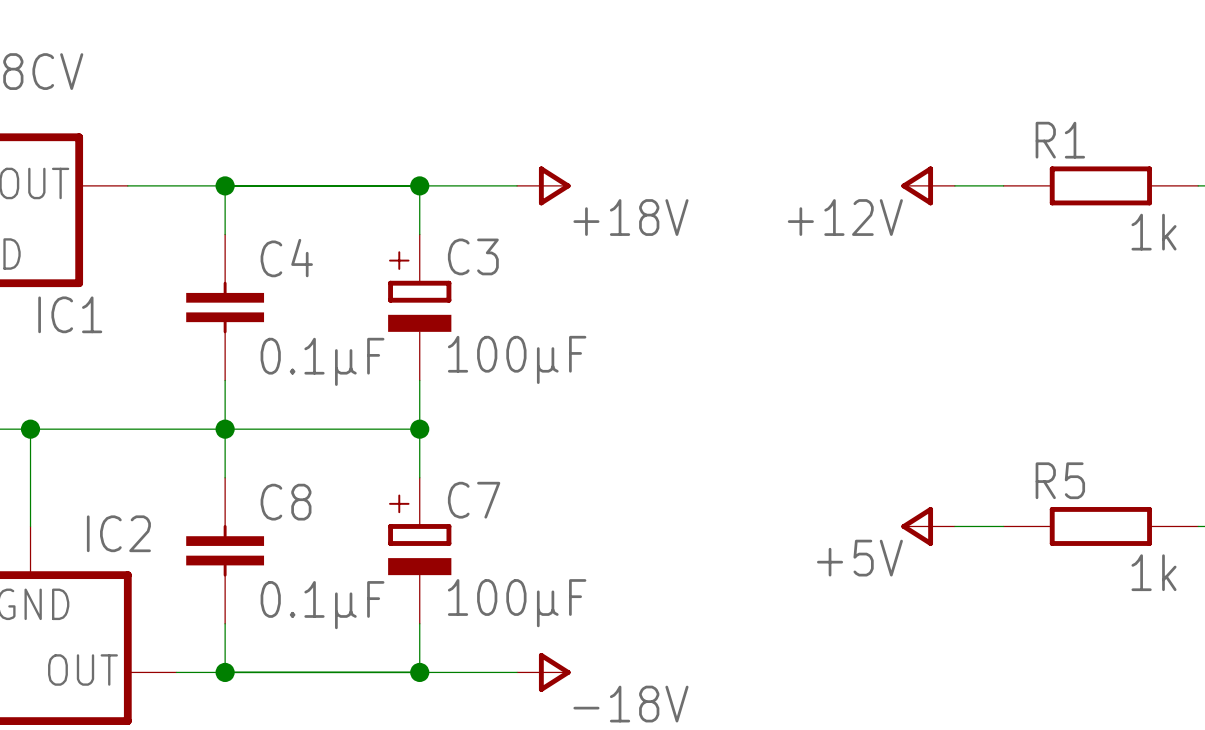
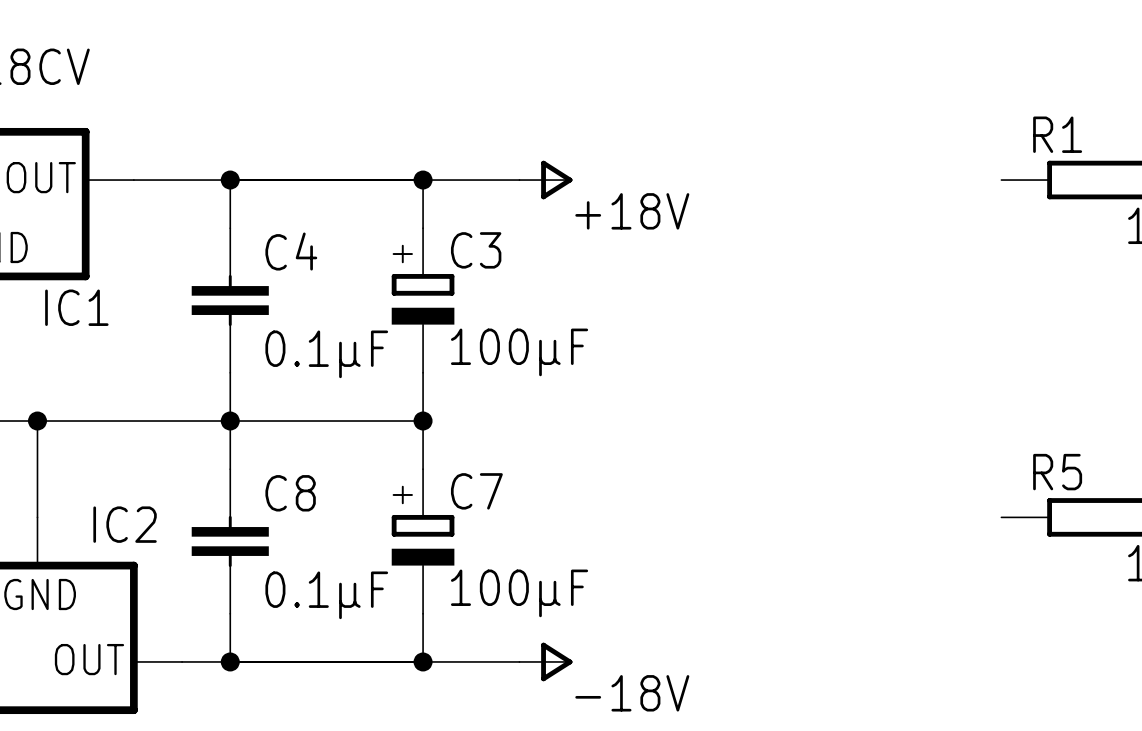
power symbol: +12V (928, 185) -> none
wire: (954, 185) (1003, 185) -> none
power symbol: +5V (928, 526) -> none
wire: (954, 526) (1003, 526) -> none

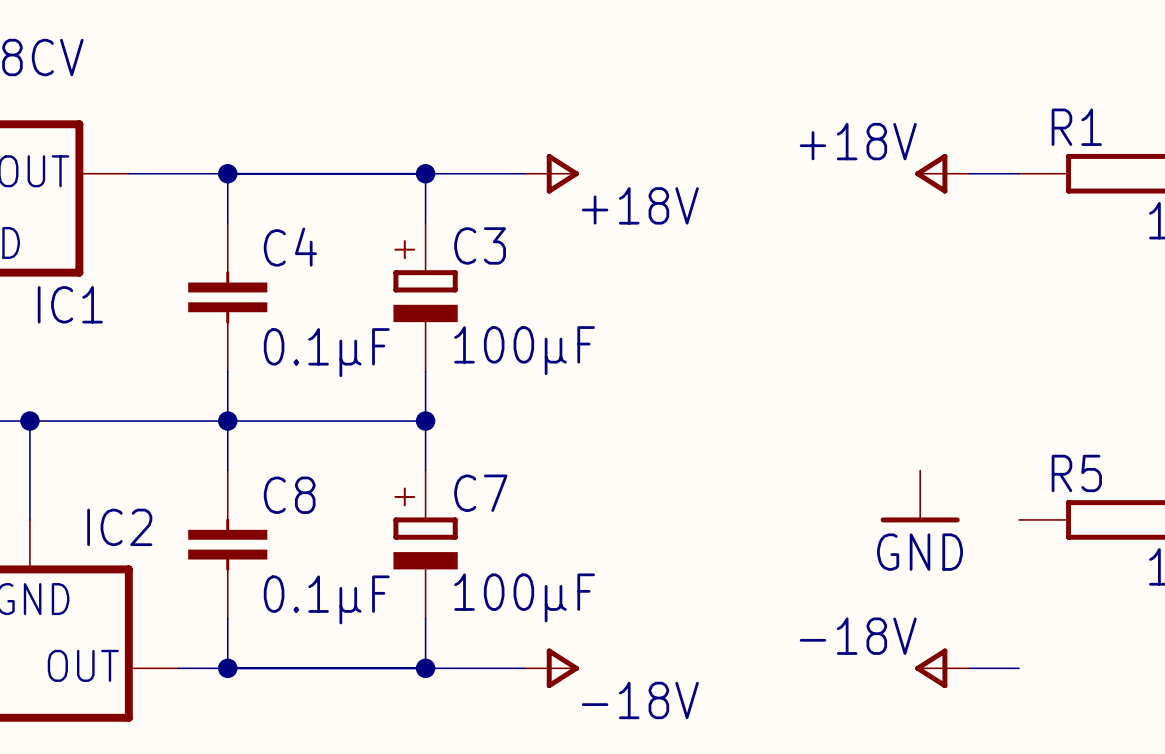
power symbol: none -> +18V (942, 173)
wire: none -> (969, 173) (1019, 173)
power symbol: none -> GND (920, 496)
power symbol: none -> -18V (942, 668)
wire: none -> (969, 668) (1019, 668)

